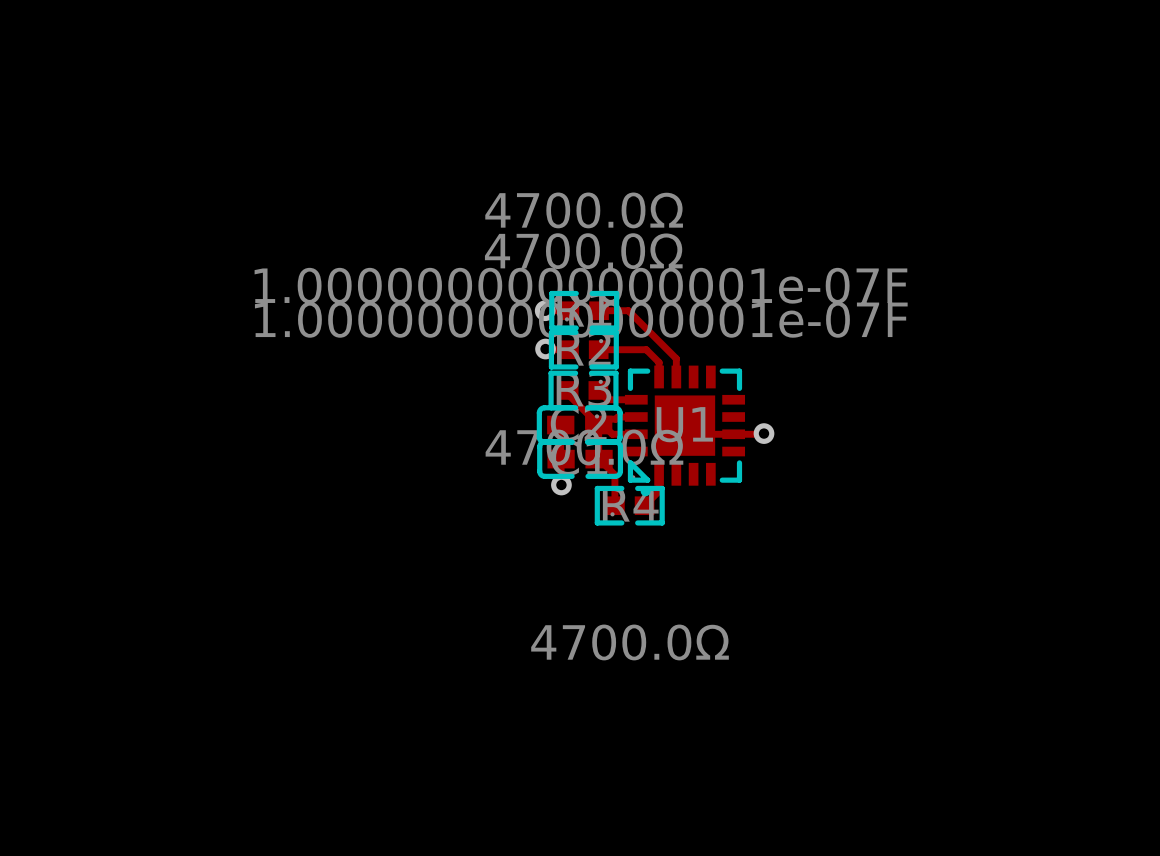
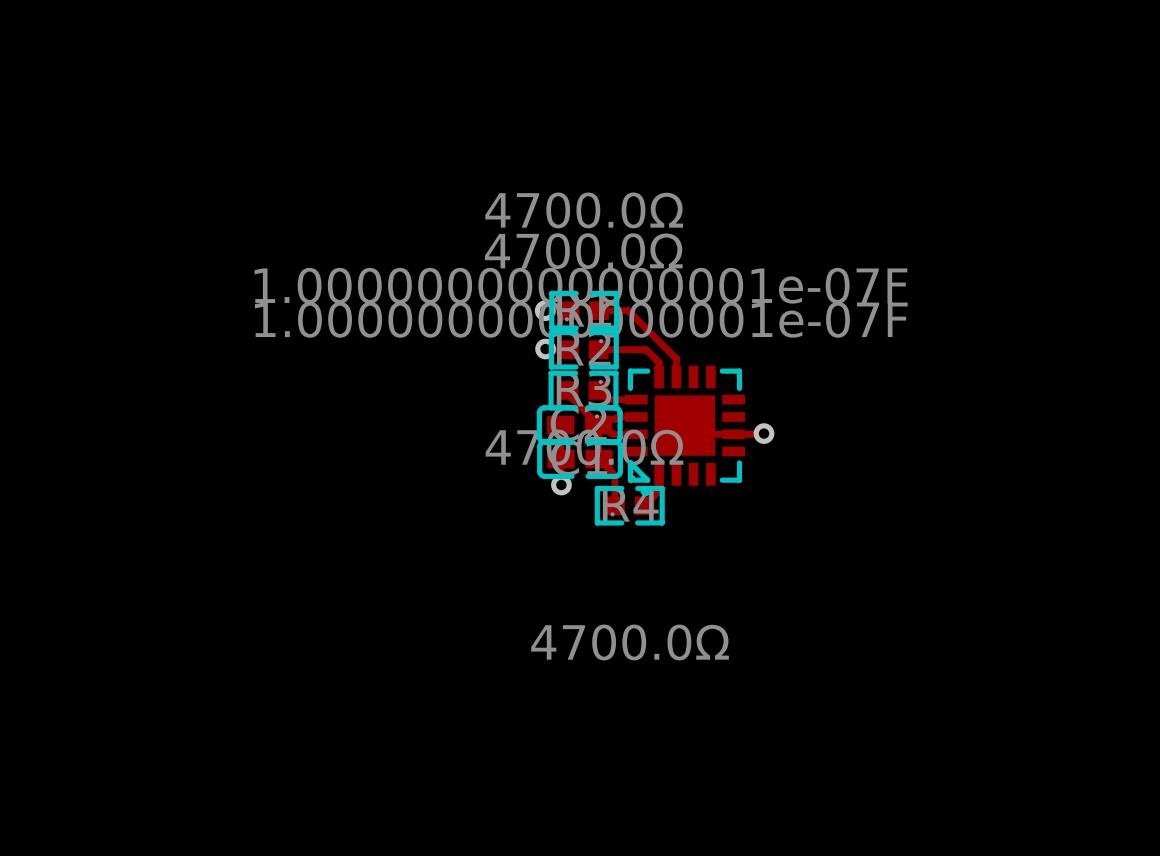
U1 name: U1 (684, 424) -> none

